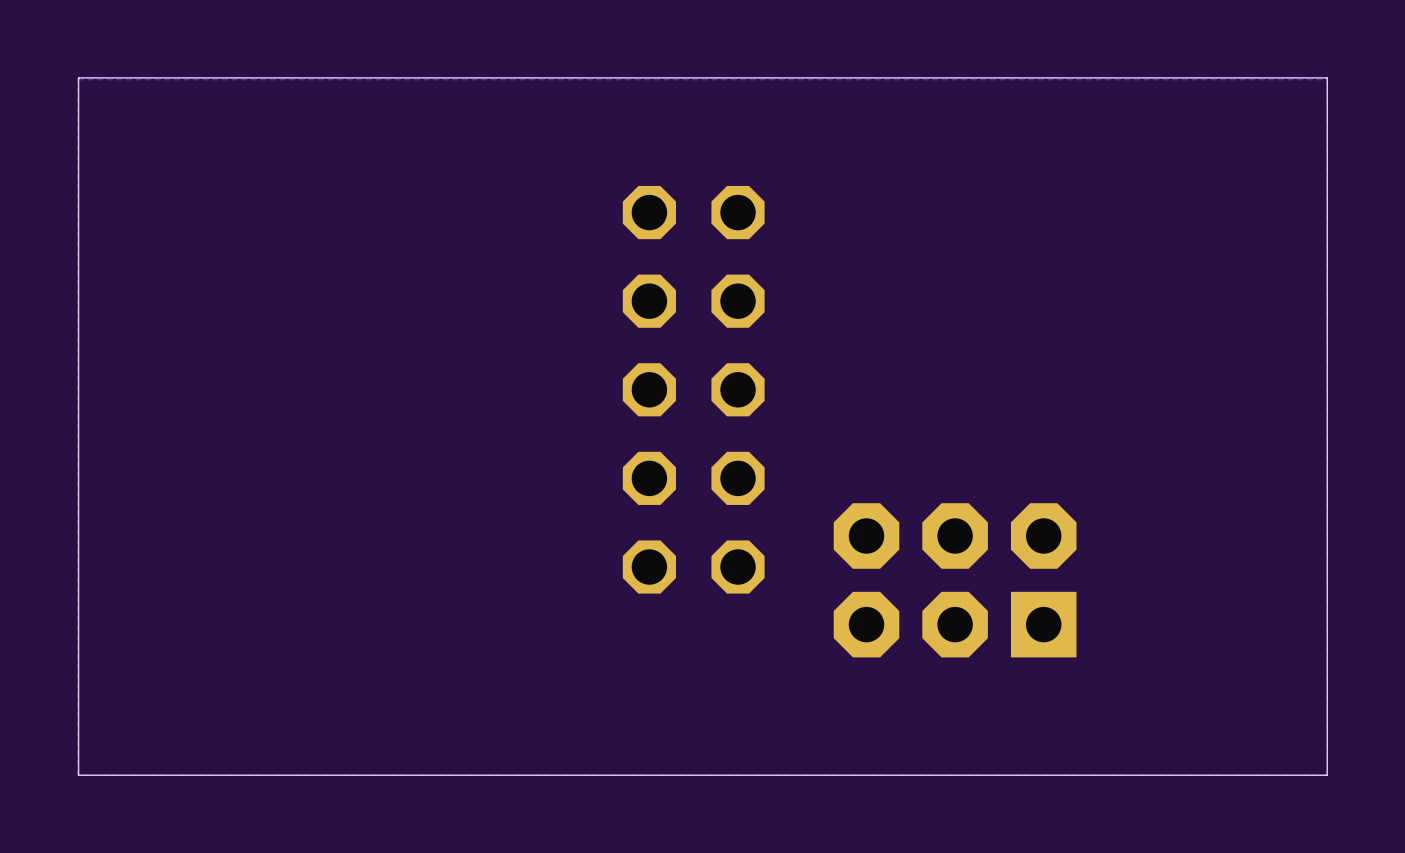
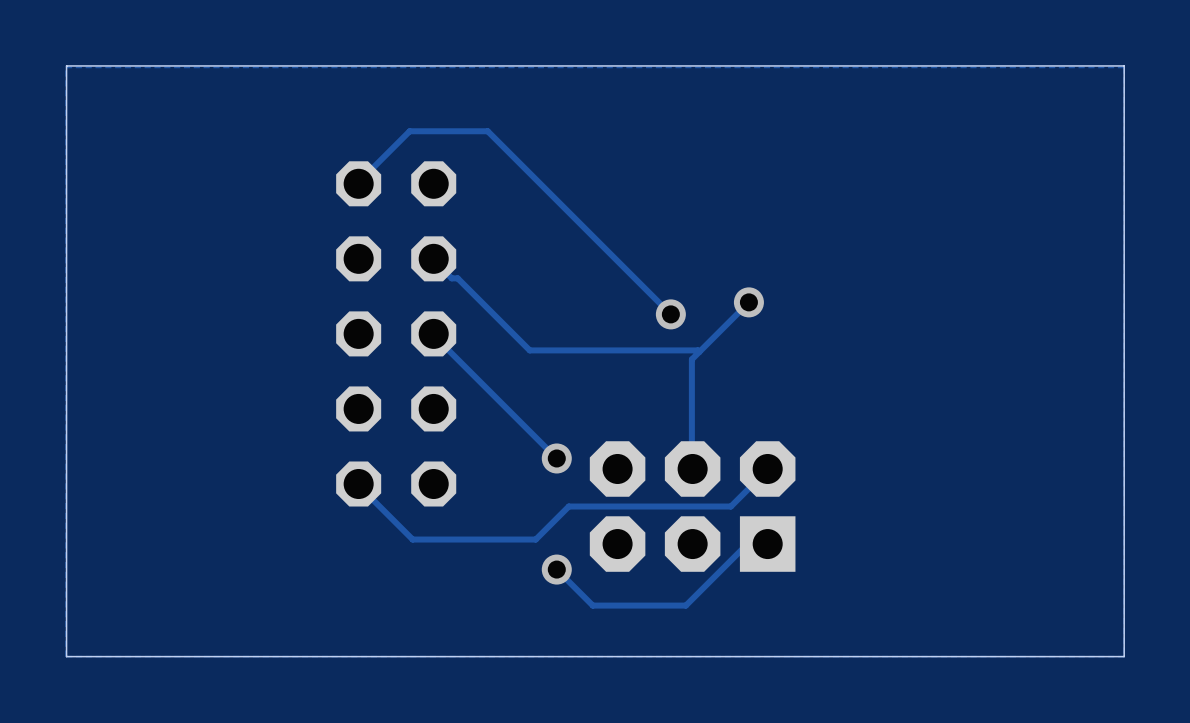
track: none -> (358, 183) (409, 131) (487, 131) (670, 314)
track: none -> (433, 258) (451, 278) (457, 278) (529, 350) (699, 351)
track: none -> (748, 302) (691, 359) (692, 468)
via: none -> (748, 302)
via: none -> (670, 314)
part position: (693, 389) -> (396, 333)
track: none -> (433, 333) (556, 458)
via: none -> (556, 458)
track: none -> (767, 468) (730, 506) (568, 506) (535, 539) (412, 539) (358, 484)
part position: (955, 580) -> (692, 506)
track: none -> (767, 544) (745, 545) (685, 605) (592, 605) (556, 569)
via: none -> (556, 569)

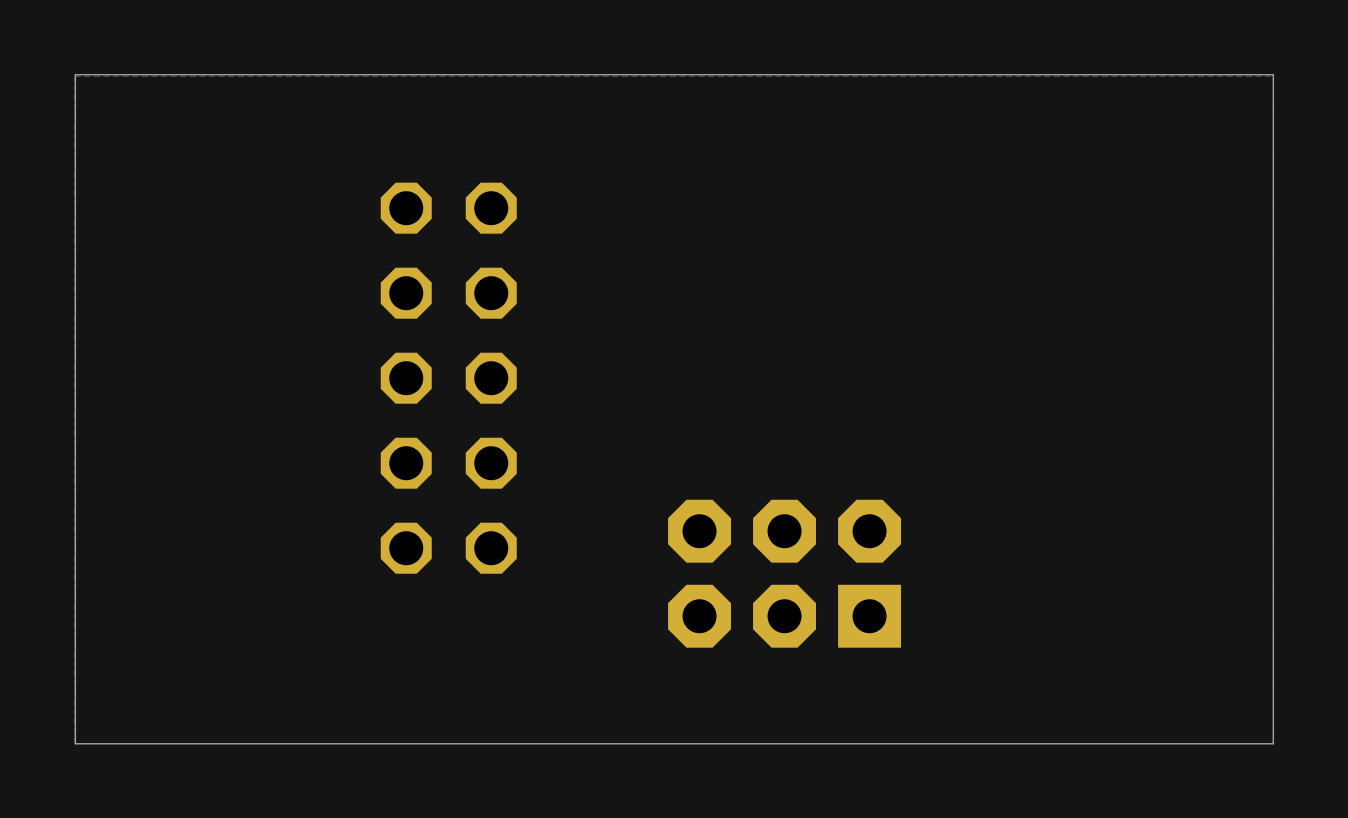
track: (358, 183) (409, 131) (487, 131) (670, 314) -> none
track: (433, 258) (451, 278) (457, 278) (529, 350) (699, 351) -> none
track: (748, 302) (691, 359) (692, 468) -> none
via: (748, 302) -> none
via: (670, 314) -> none
track: (433, 333) (556, 458) -> none
via: (556, 458) -> none
track: (767, 468) (730, 506) (568, 506) (535, 539) (412, 539) (358, 484) -> none
track: (767, 544) (745, 545) (685, 605) (592, 605) (556, 569) -> none
via: (556, 569) -> none

